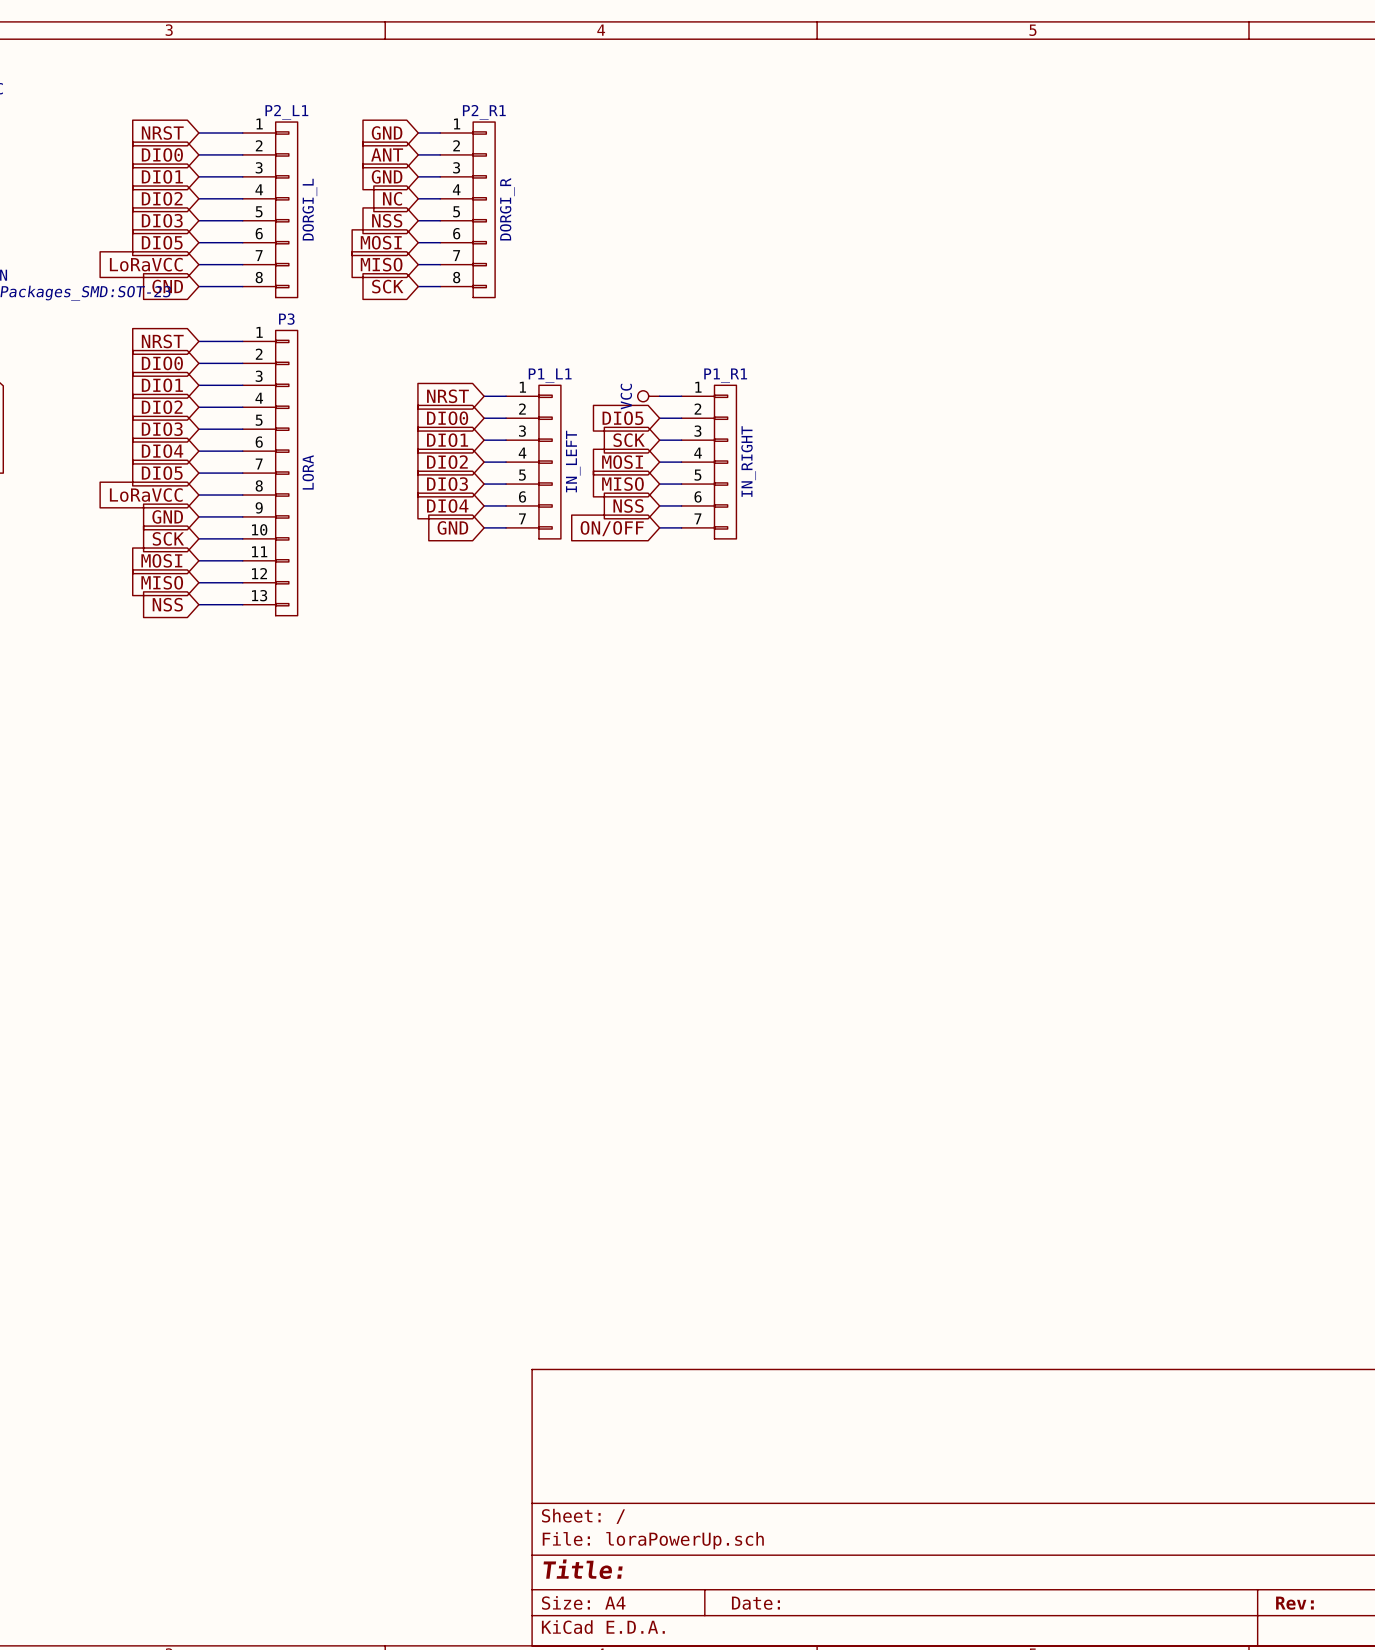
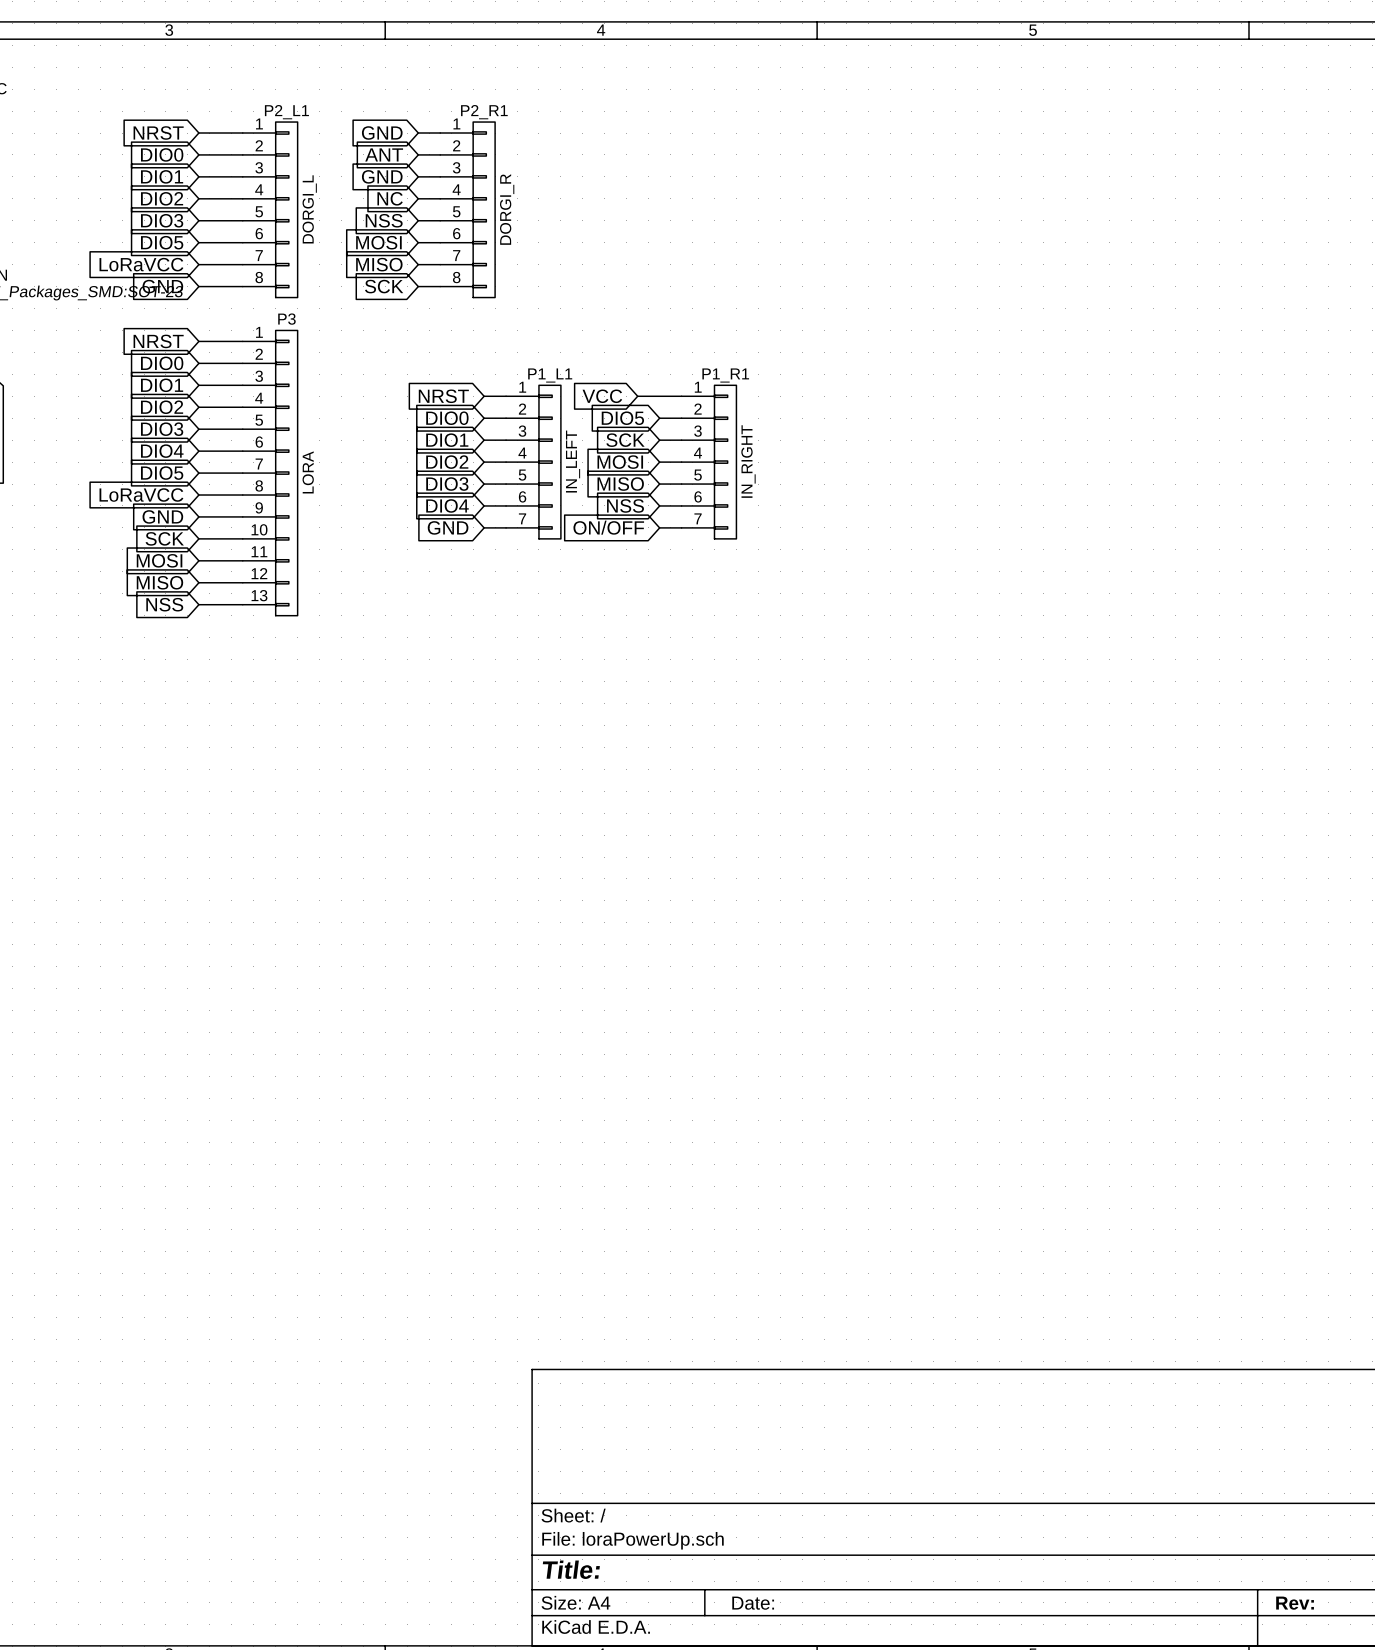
global label: none -> VCC (602, 396)
power symbol: VCC (648, 396) -> none

